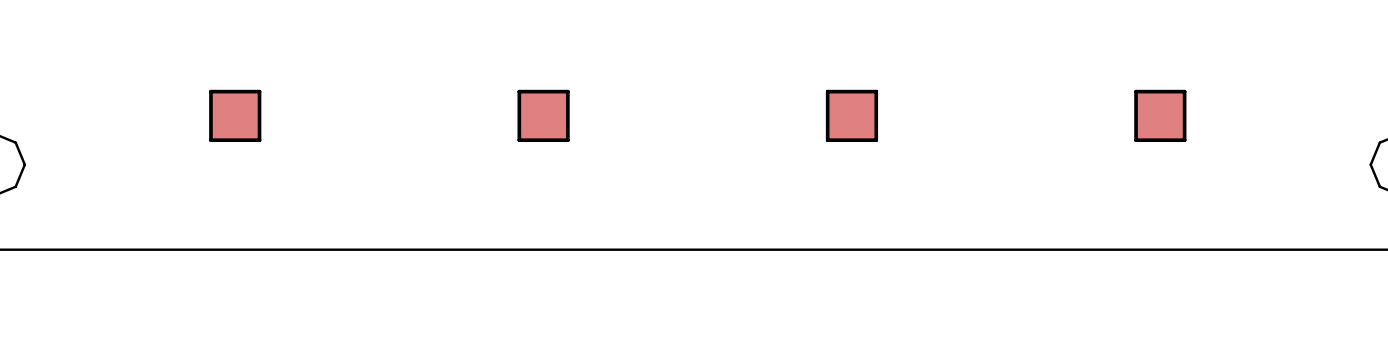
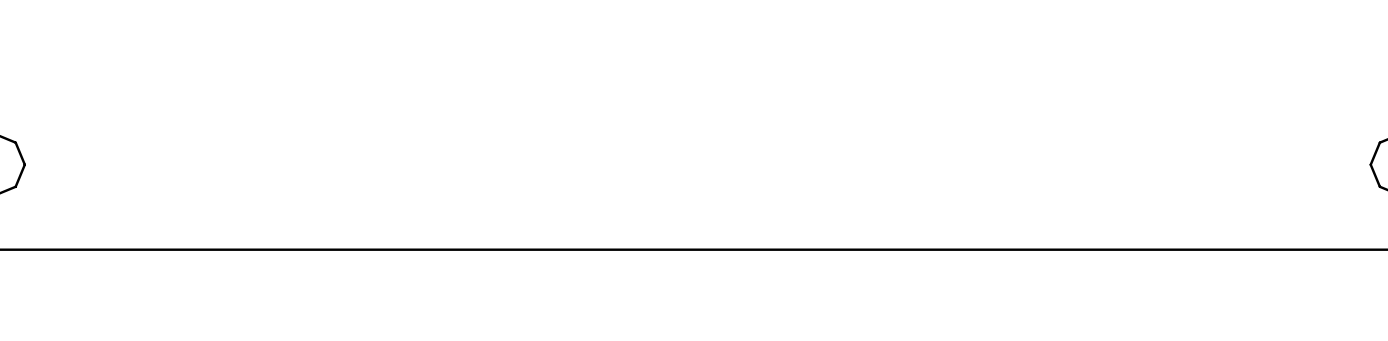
part: (235, 115) -> none
part: (543, 115) -> none
part: (851, 115) -> none
part: (1160, 115) -> none

